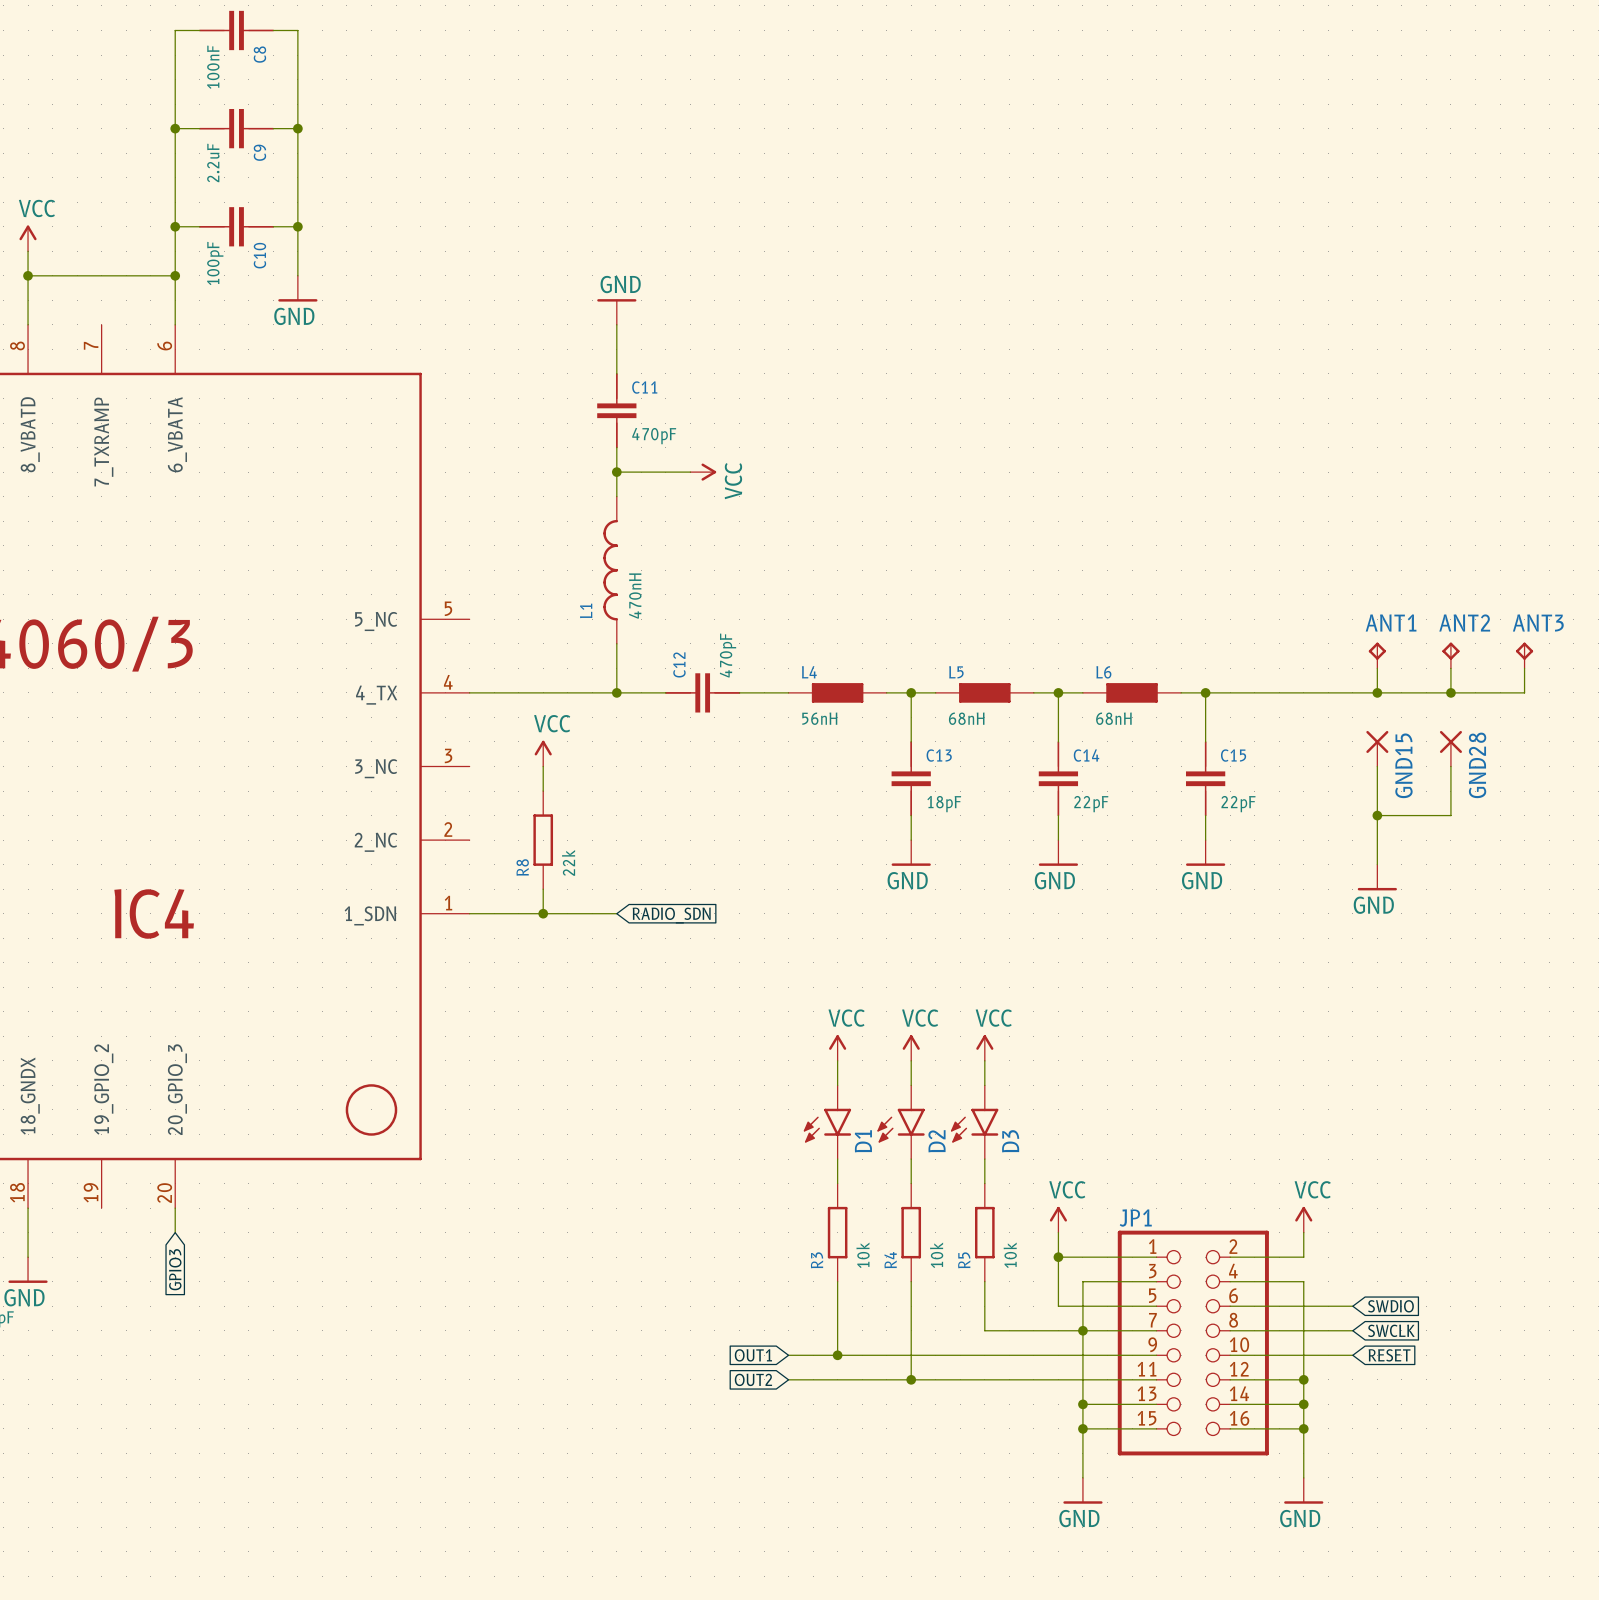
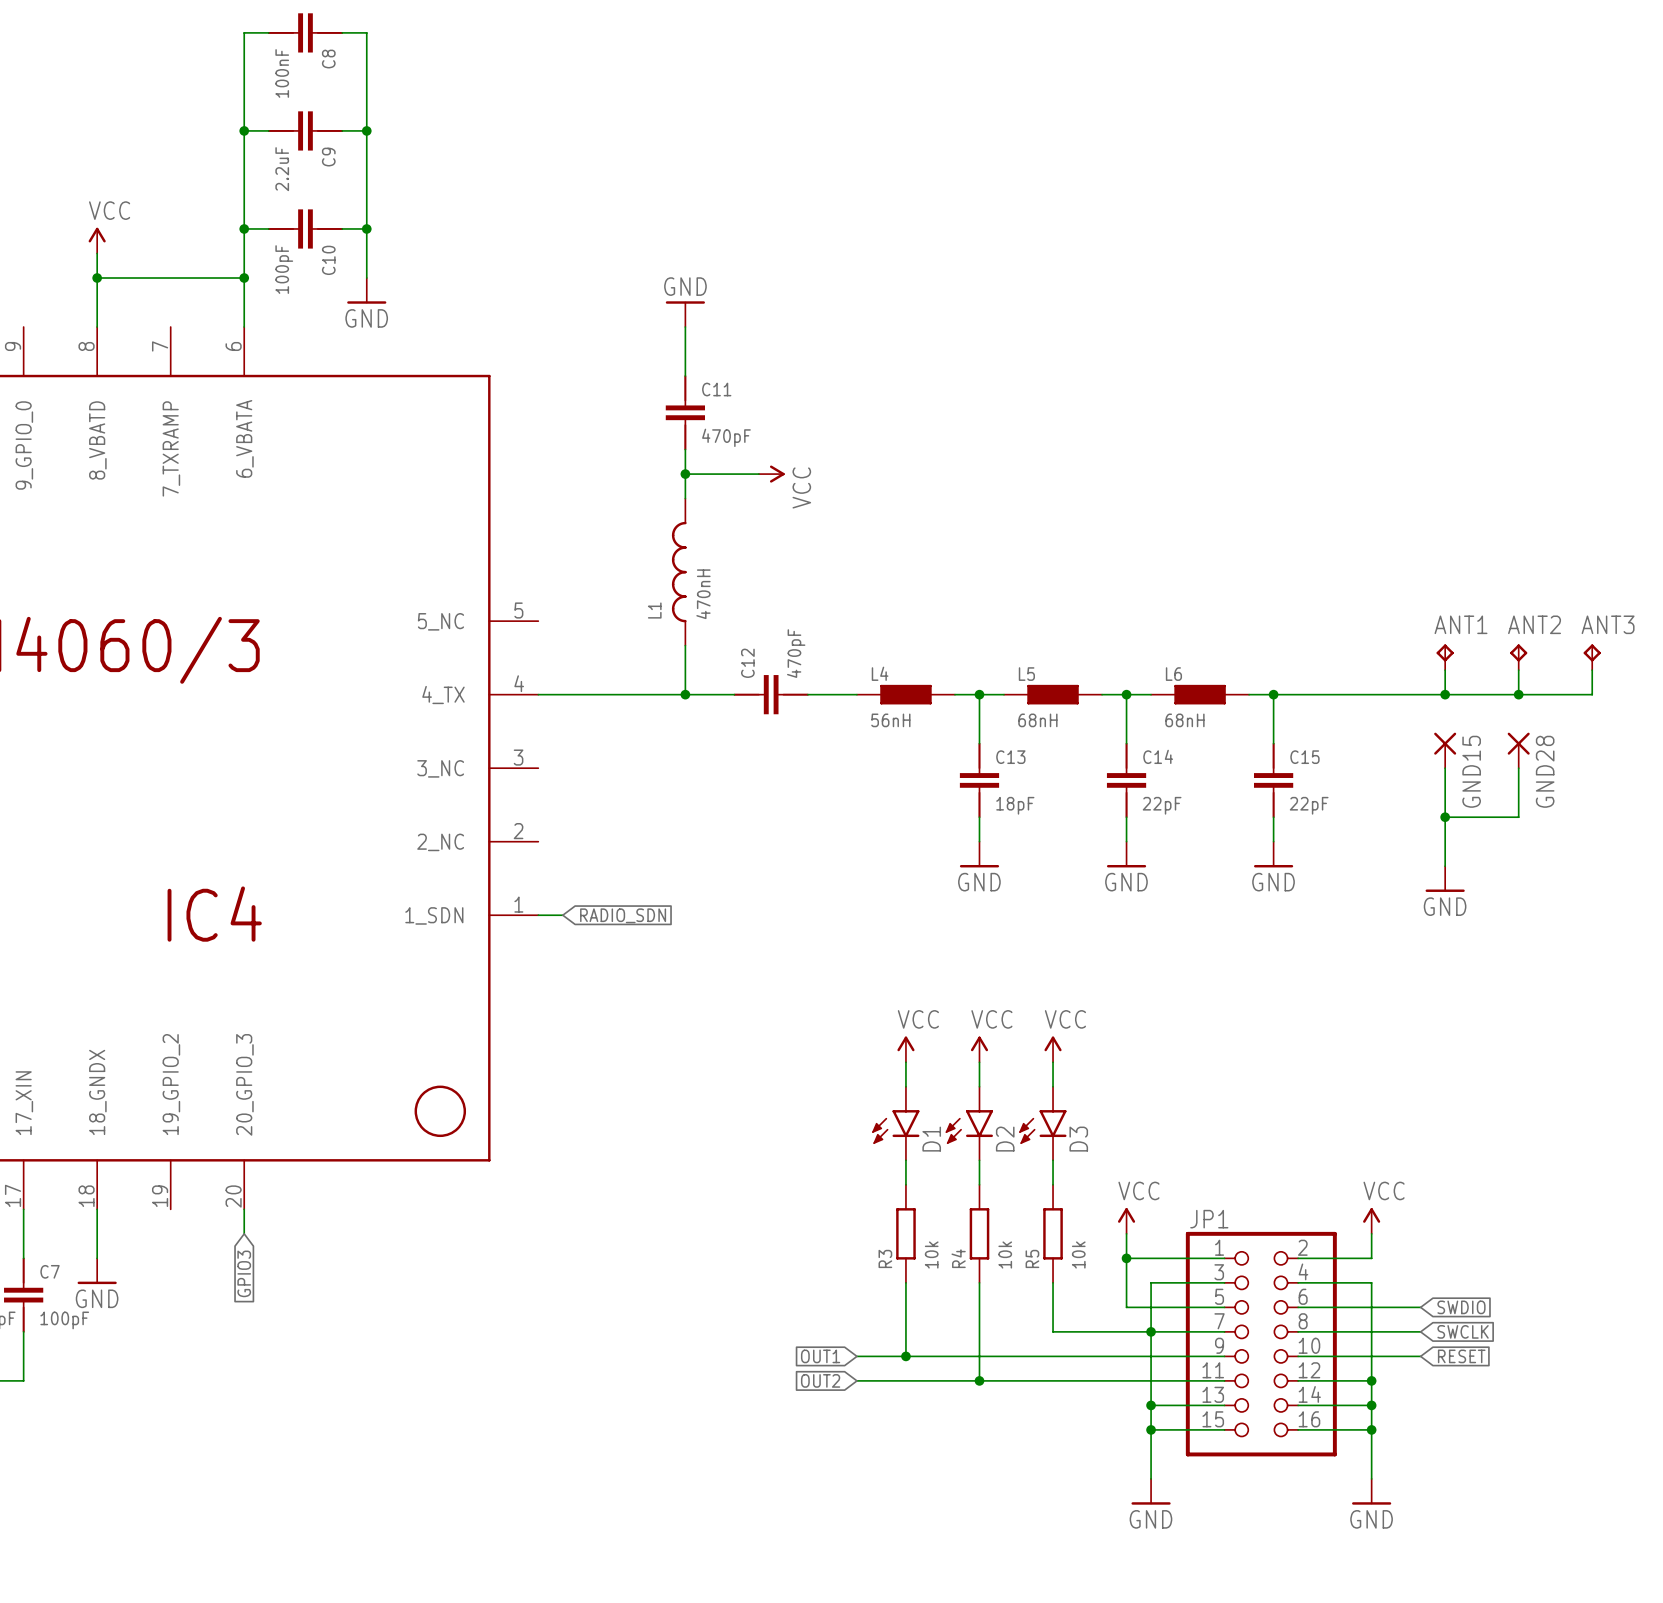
power symbol: VCC (543, 753) -> none
wire: (543, 766) (543, 791) -> none
R8: 22k (543, 840) -> none
wire: (543, 889) (543, 913) -> none
wire: (494, 913) (616, 913) -> none
junction: (543, 913) -> none
global label position: RADIO_SDN (671, 915) -> RADIO_SDN (623, 915)

